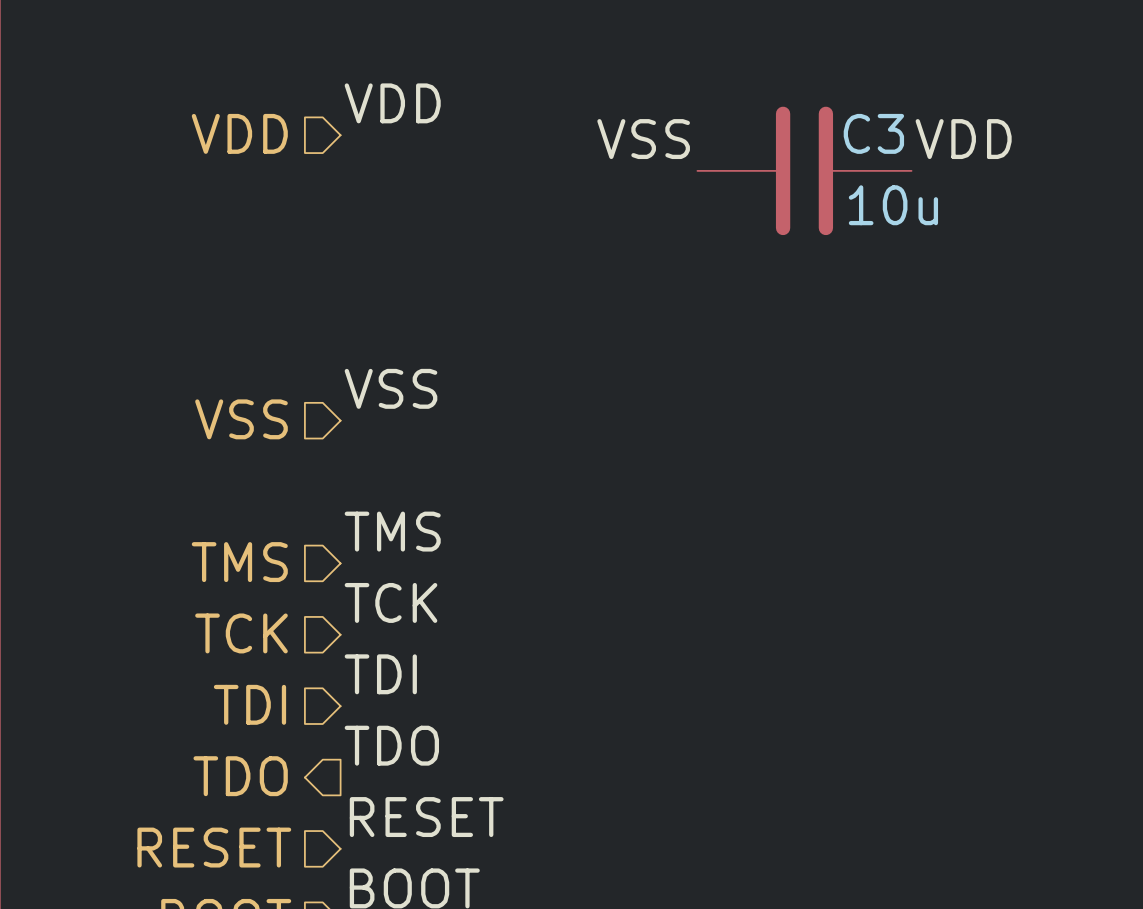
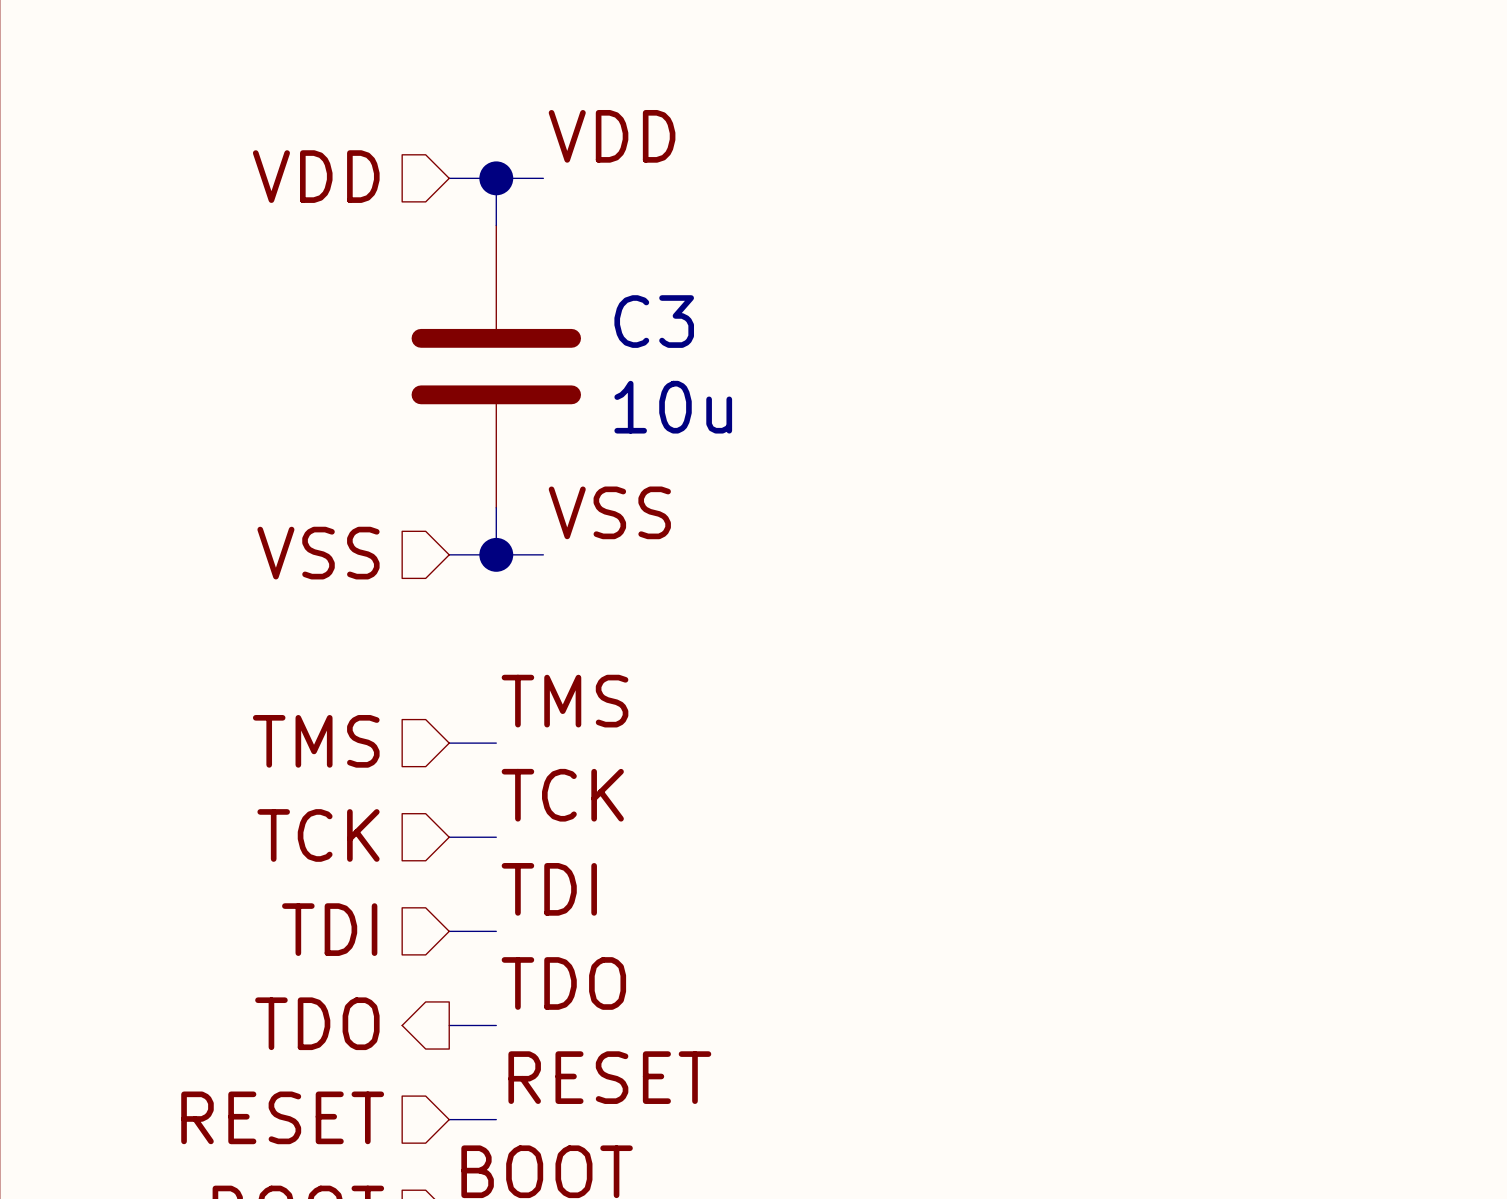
label position: VDD (392, 103) -> VDD (612, 136)
C3 name position: C3 (873, 133) -> C3 (654, 321)
wire: none -> (449, 178) (543, 178)
wire: none -> (496, 178) (496, 225)
junction: none -> (496, 178)
label: VSS (643, 139) -> none
label: VDD (963, 139) -> none
C3 rotation: 0° (804, 170) -> 90° clockwise (496, 366)
C3 position: (804, 170) -> (496, 366)
C3 value position: 10u (893, 205) -> 10u (673, 407)
wire: none -> (496, 507) (496, 554)
label position: VSS (391, 388) -> VSS (609, 512)
wire: none -> (449, 554) (543, 554)
junction: none -> (496, 554)
label position: TMS (392, 531) -> TMS (565, 701)
wire: none -> (449, 743) (496, 743)
label position: TCK (391, 602) -> TCK (562, 795)
wire: none -> (449, 837) (496, 837)
label position: TDI (380, 674) -> TDI (549, 889)
wire: none -> (449, 931) (496, 931)
label position: TDO (391, 745) -> TDO (563, 983)
wire: none -> (449, 1025) (496, 1025)
label position: RESET (426, 817) -> RESET (609, 1077)
wire: none -> (449, 1119) (496, 1119)

